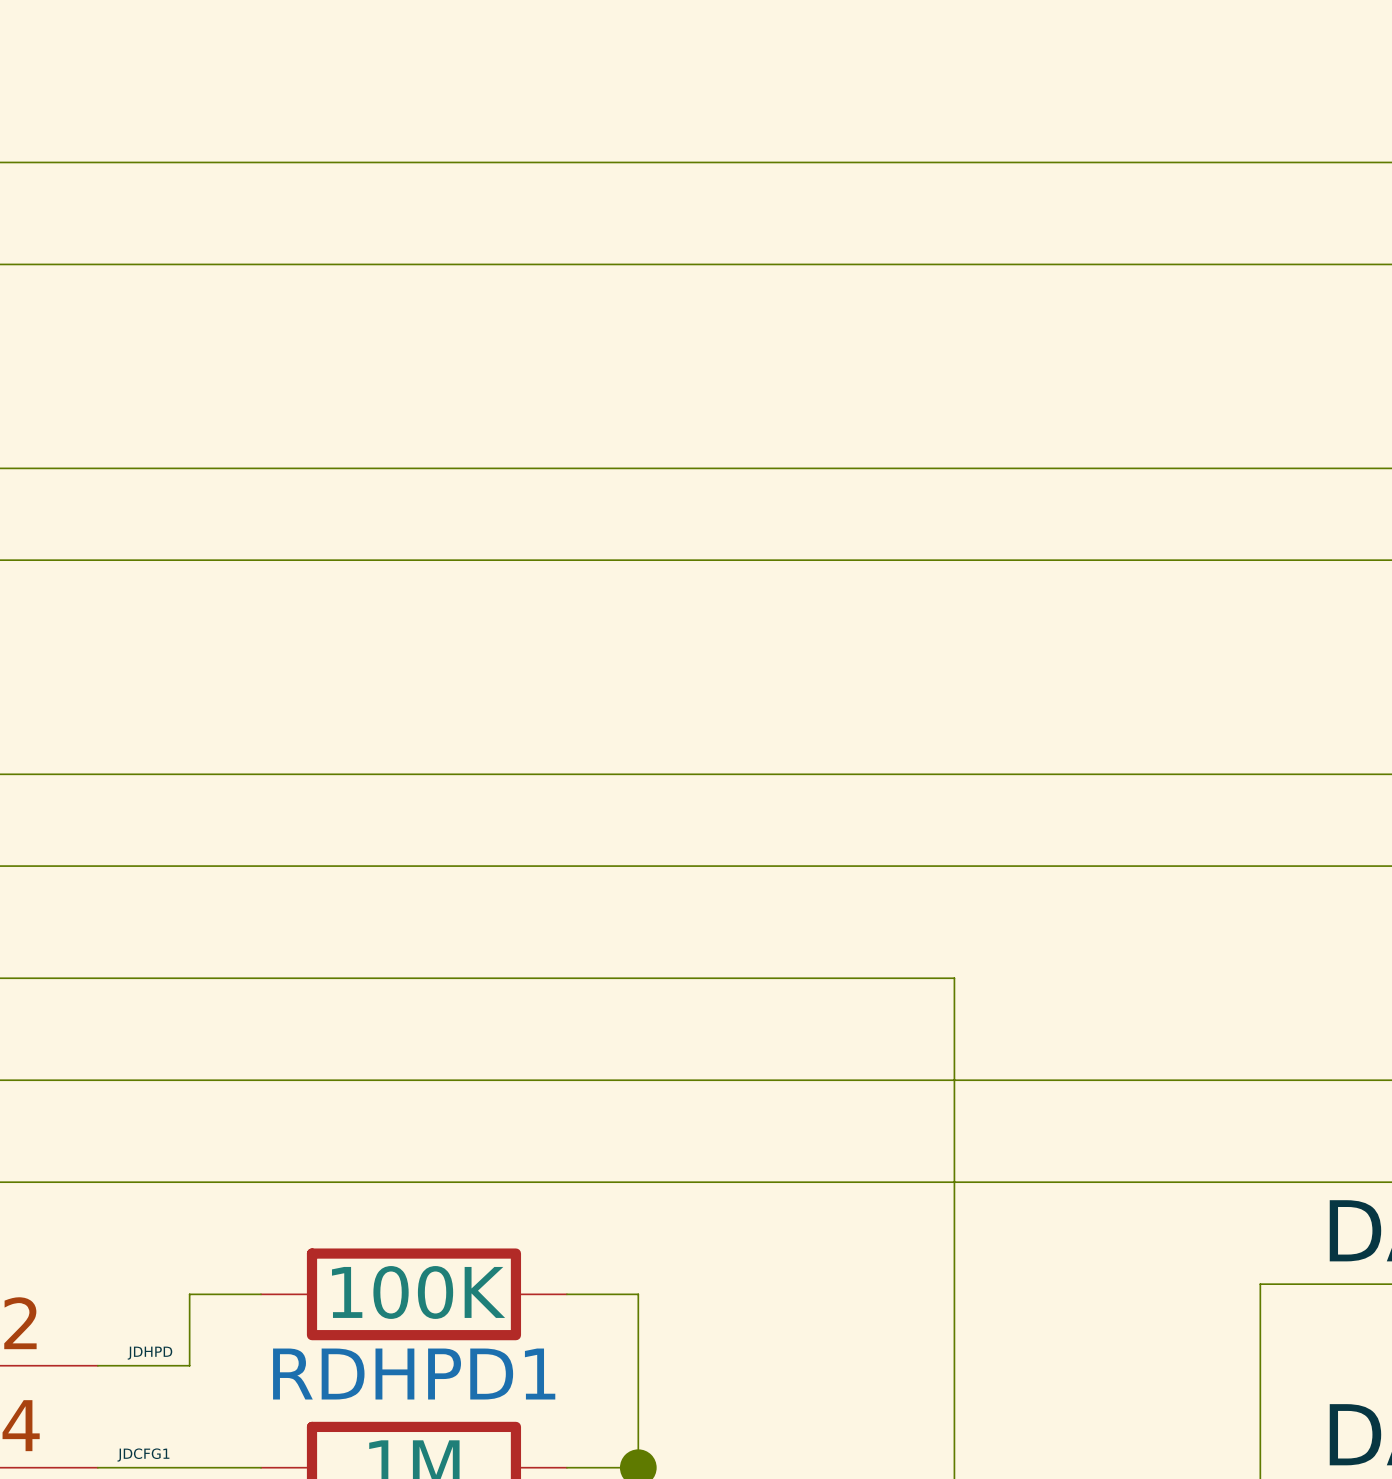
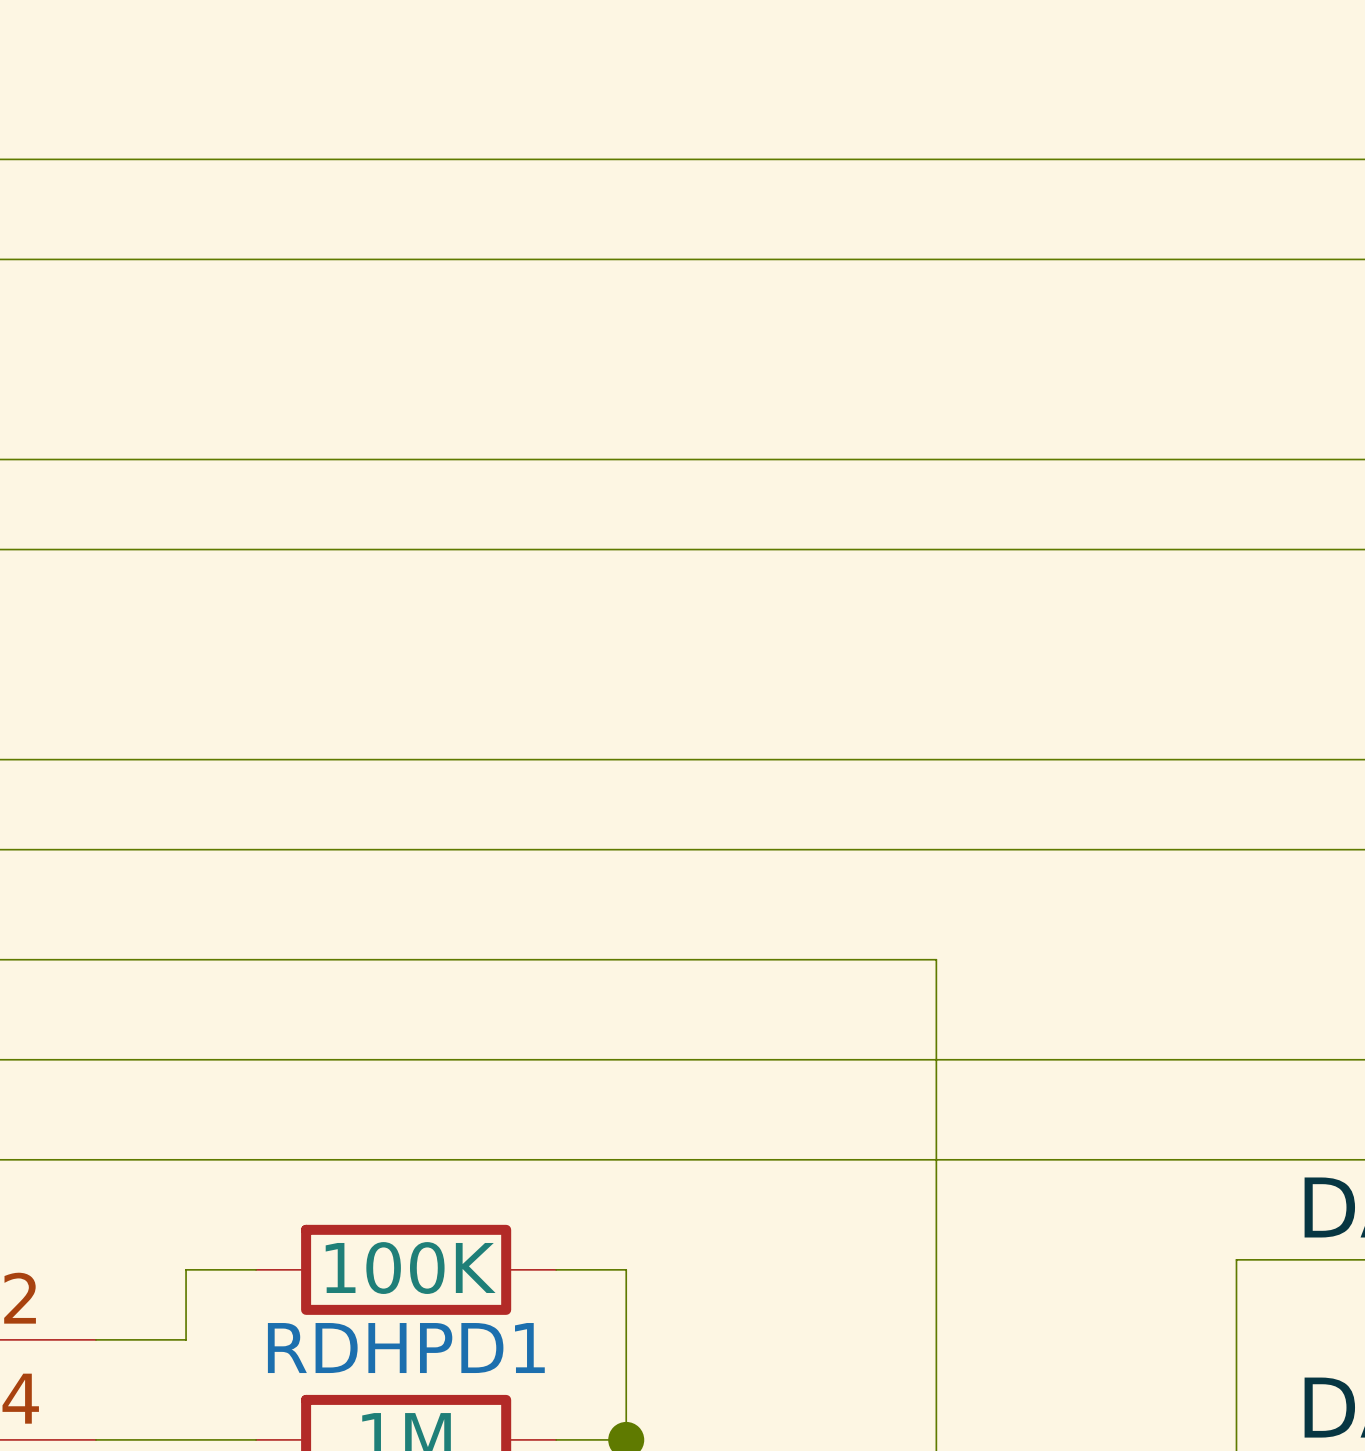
label: JDHPD (149, 1353) -> none
label: JDCFG1 (143, 1455) -> none

